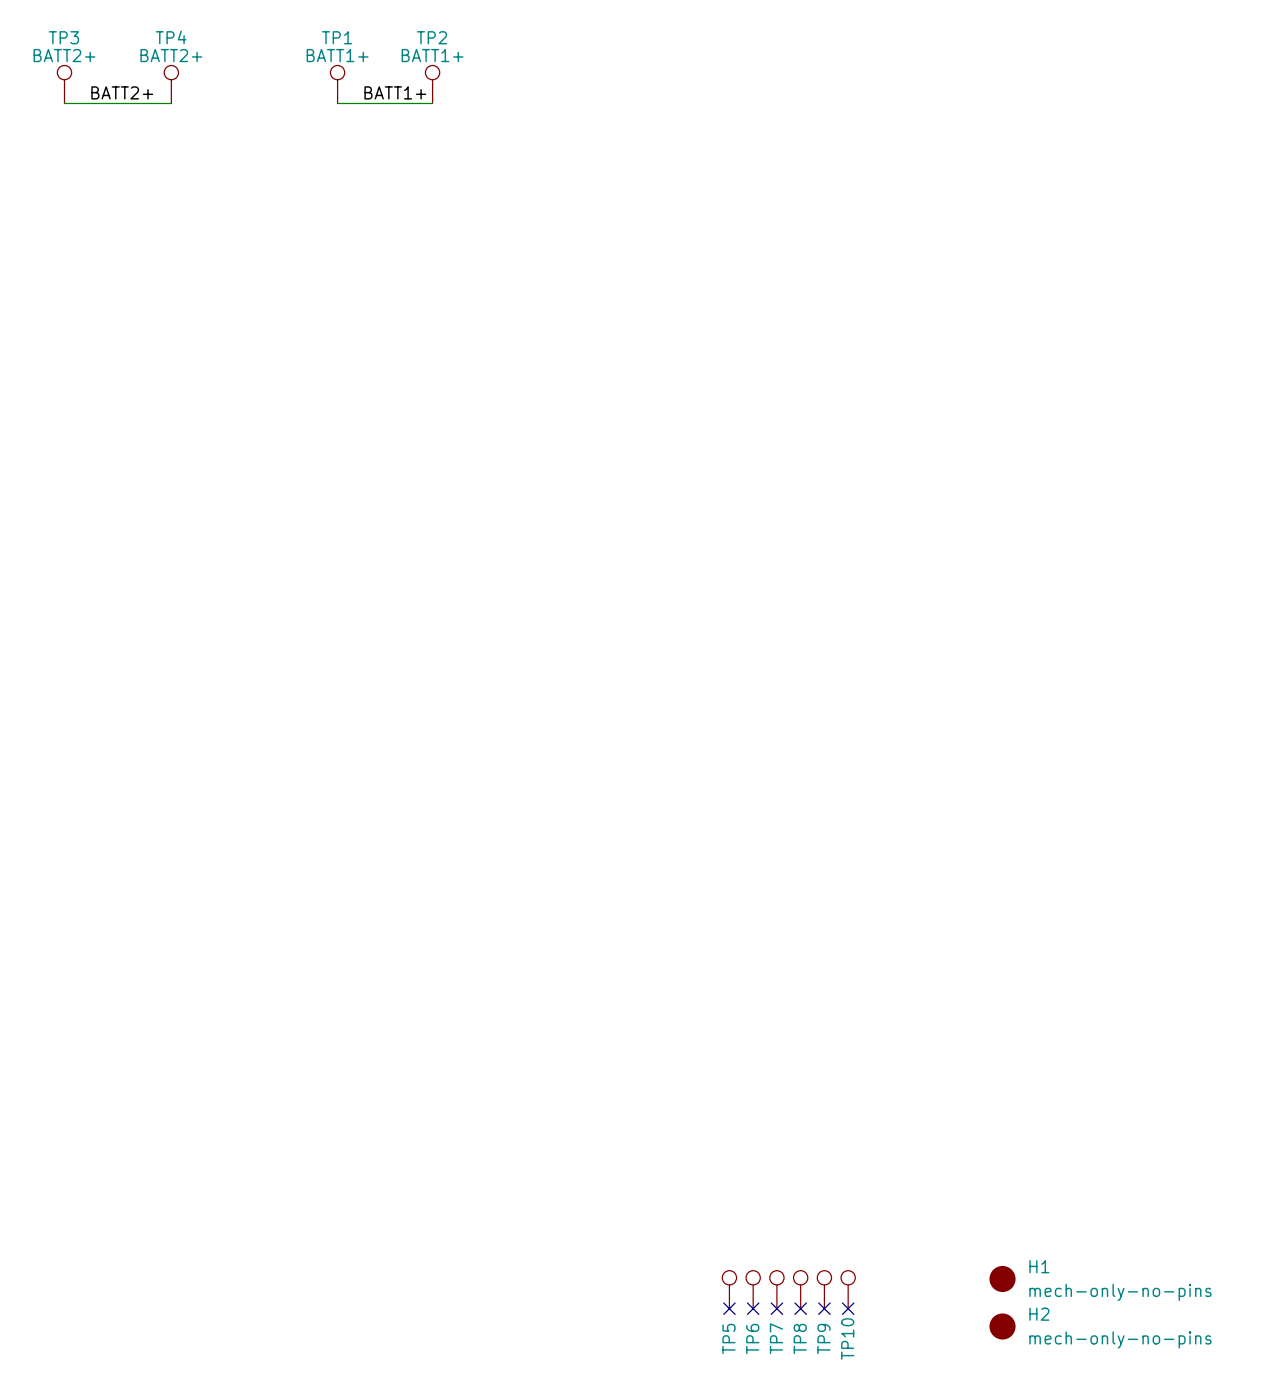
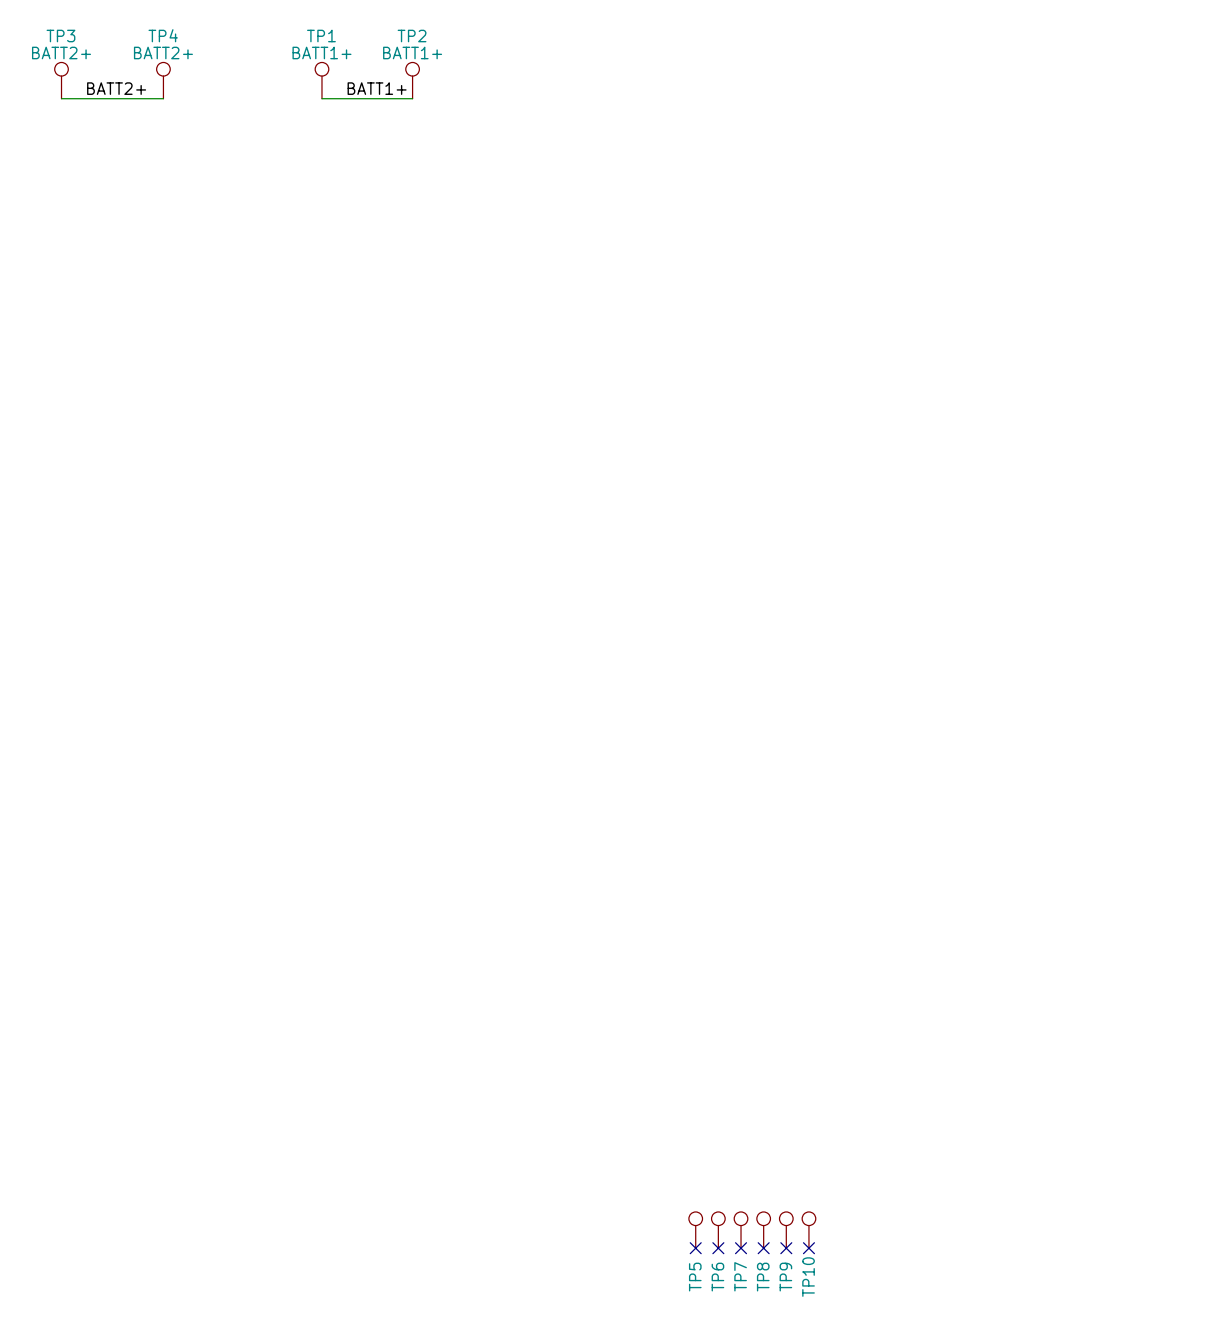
H1: mech-only-no-pins (1002, 1279) -> none
H2: mech-only-no-pins (1002, 1326) -> none

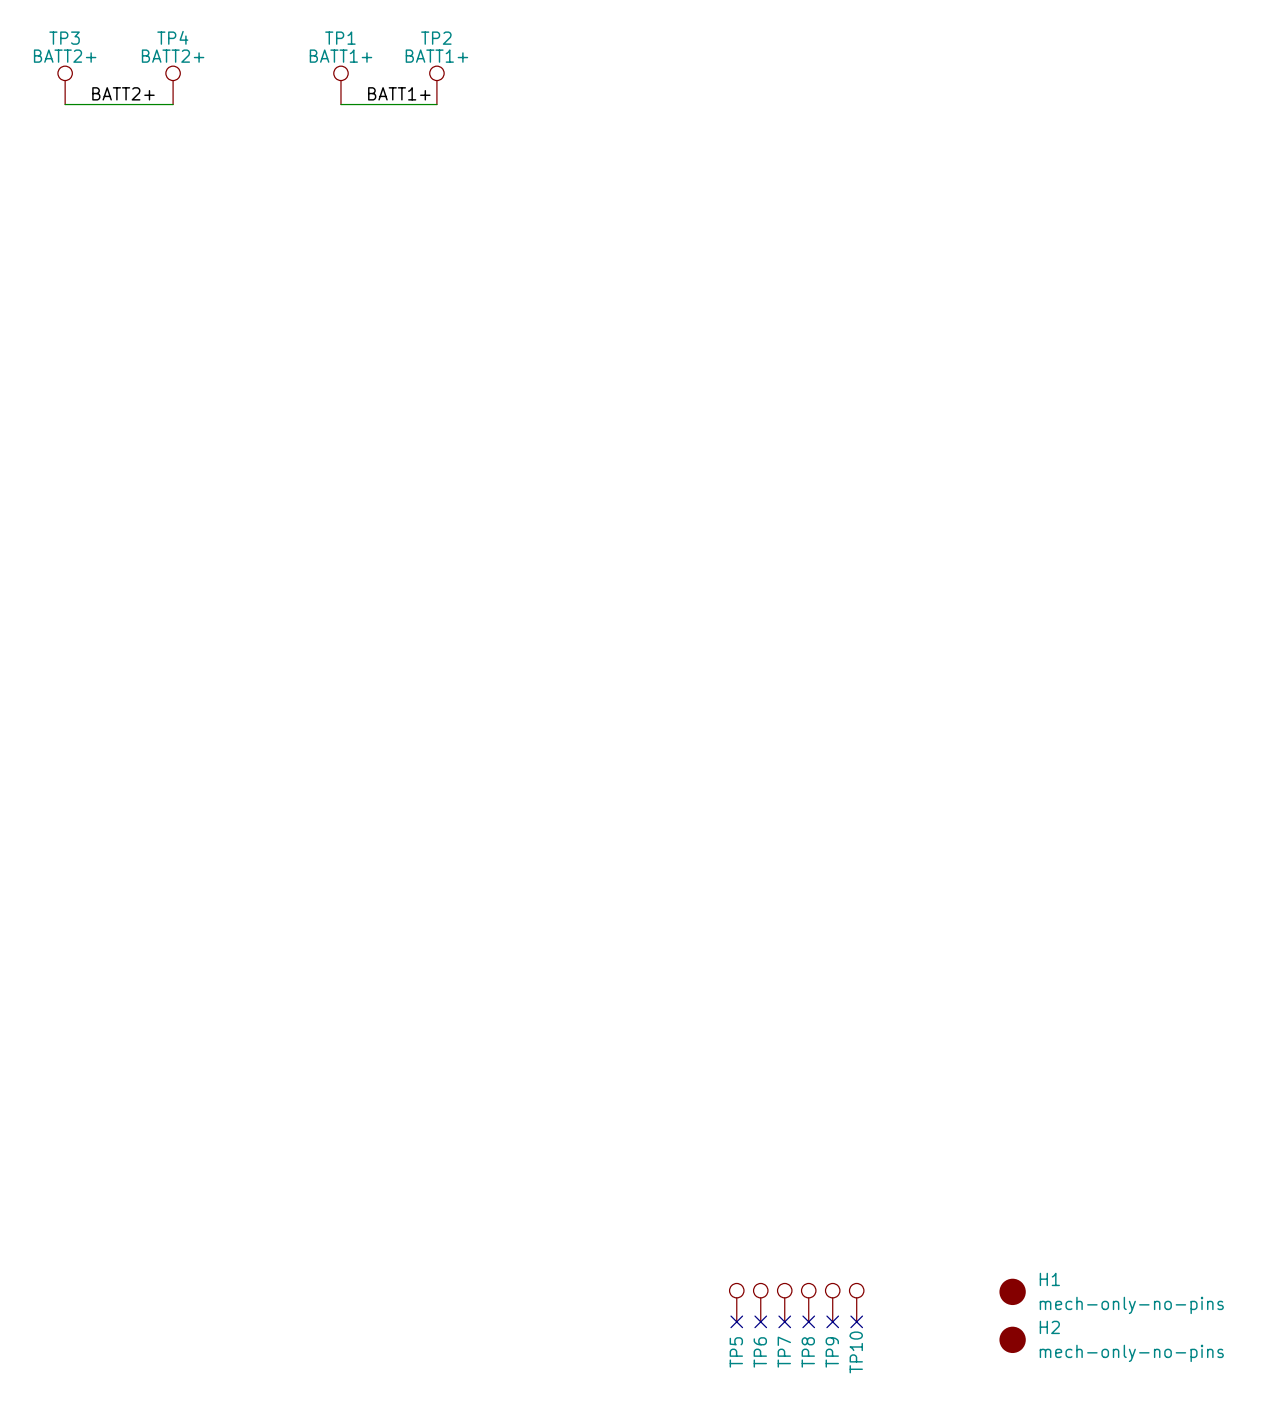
H1: none -> mech-only-no-pins (1012, 1291)
H2: none -> mech-only-no-pins (1012, 1339)

